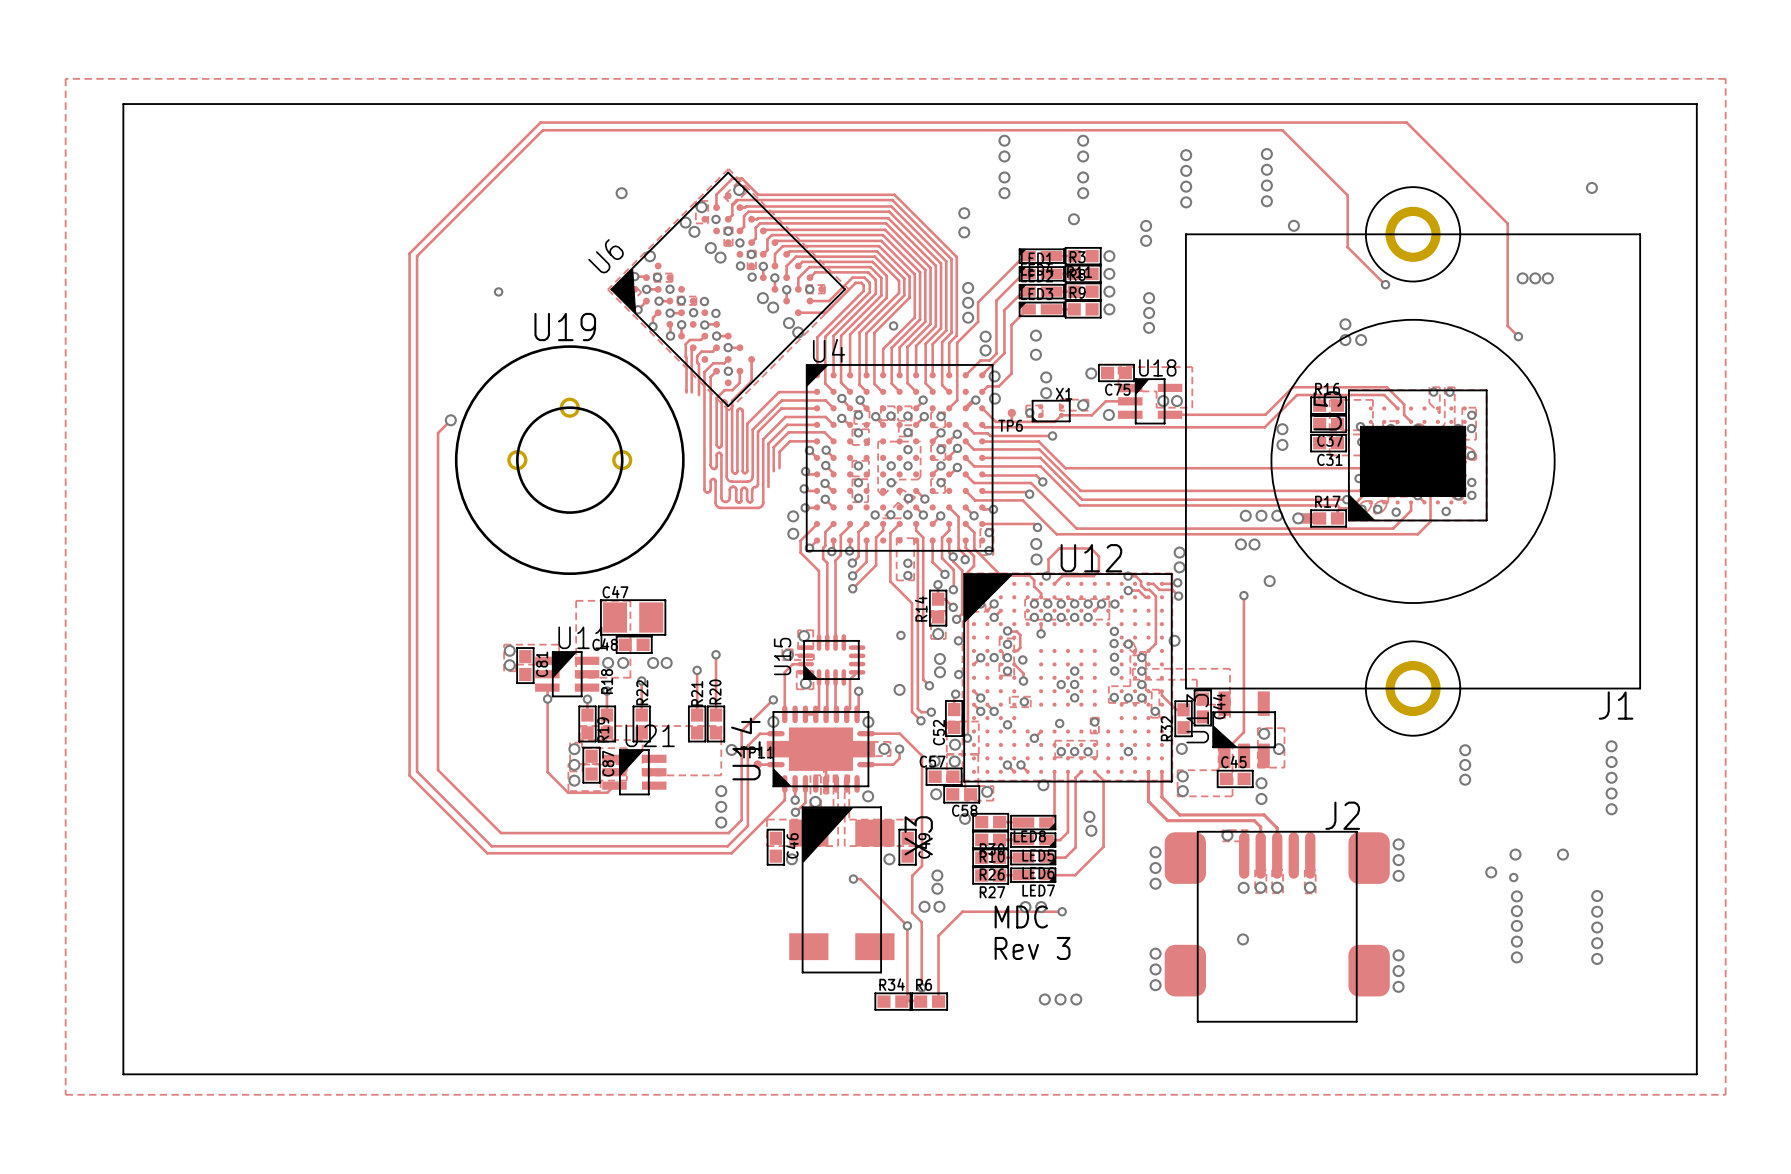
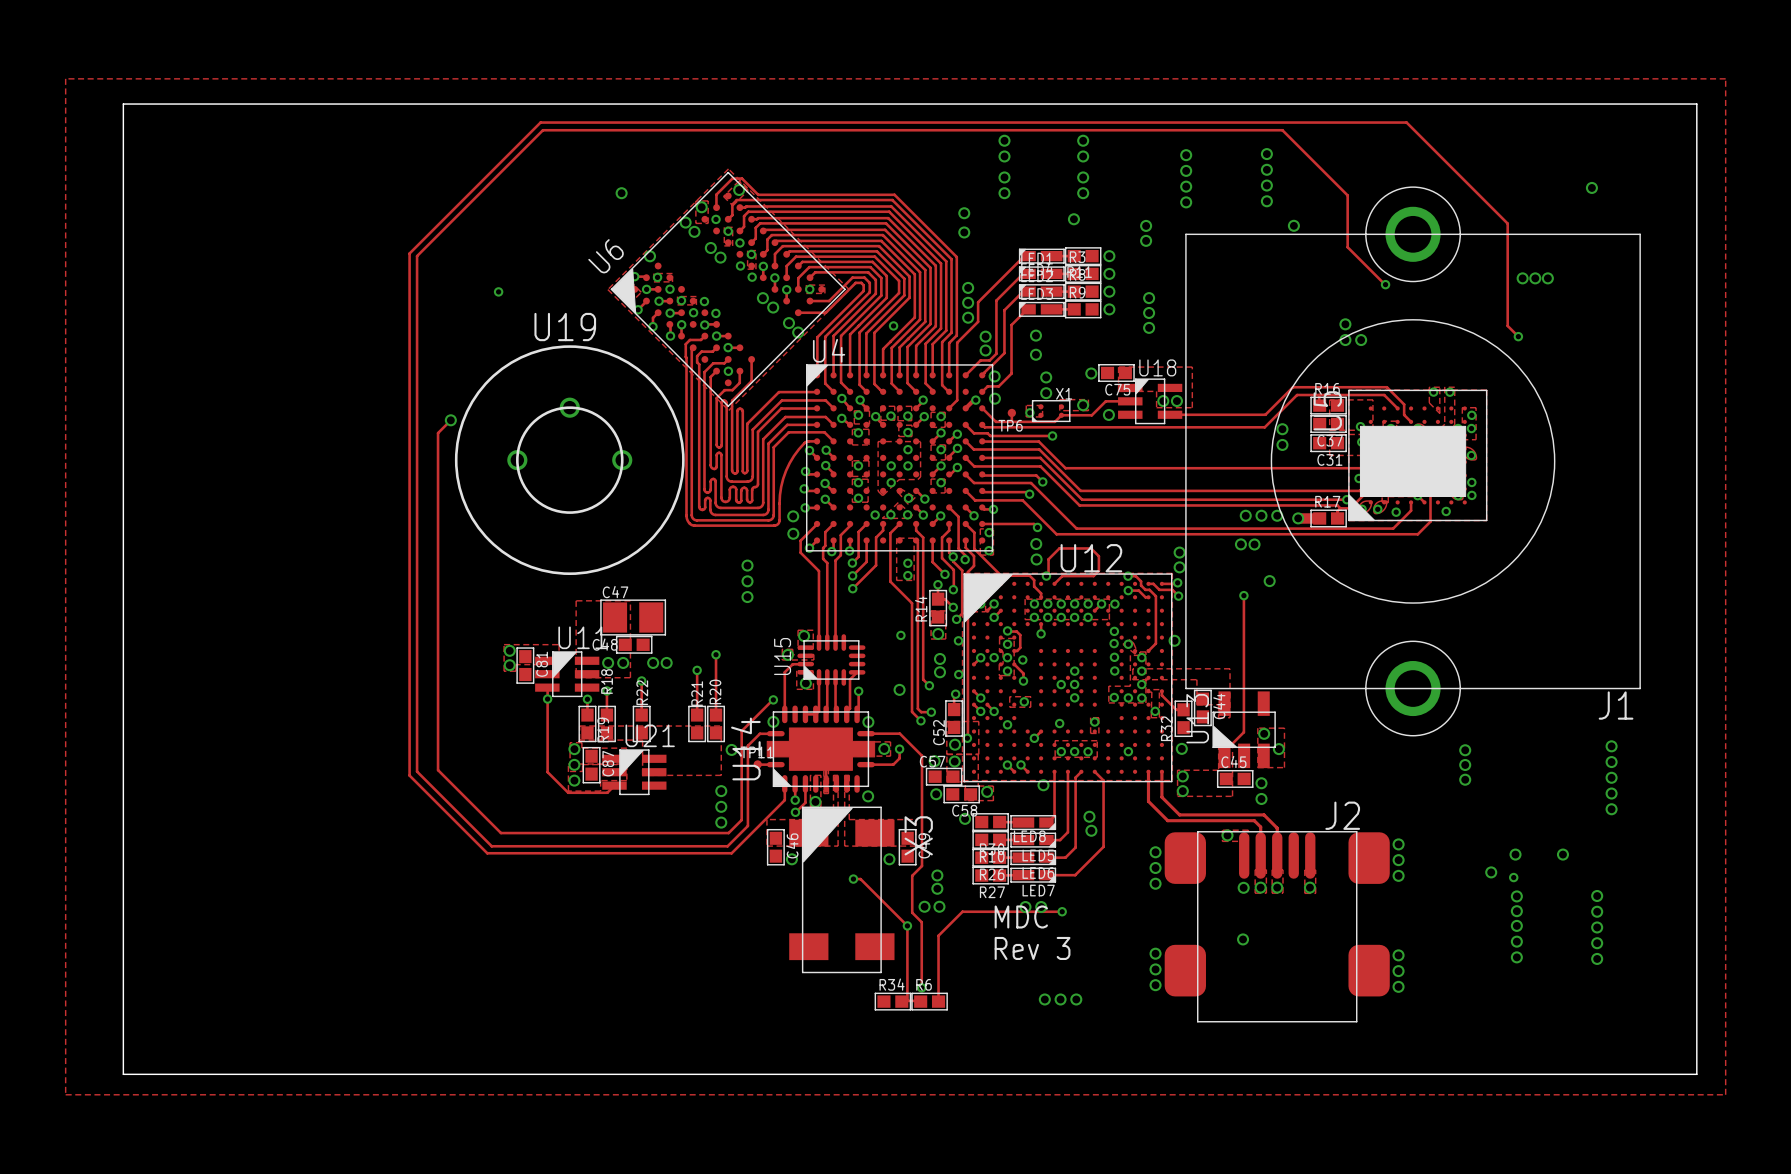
track: (698, 364) (698, 395) -> (699, 364) (699, 506) (702, 509)
track: none -> (691, 392) (693, 518) (771, 519) (773, 515) (773, 471)
track: (808, 441) (789, 441) (779, 451) (779, 468) -> (808, 441) (798, 449) (786, 470) (781, 486) (779, 521) (777, 524) (692, 525) (688, 521) (686, 515) (686, 392)
track: none -> (768, 486) (768, 510) (765, 514) (714, 514) (710, 511) (710, 500) (708, 497) (705, 499) (705, 507) (702, 509)
via: none -> (747, 565)
via: none -> (747, 581)
via: none -> (747, 597)

